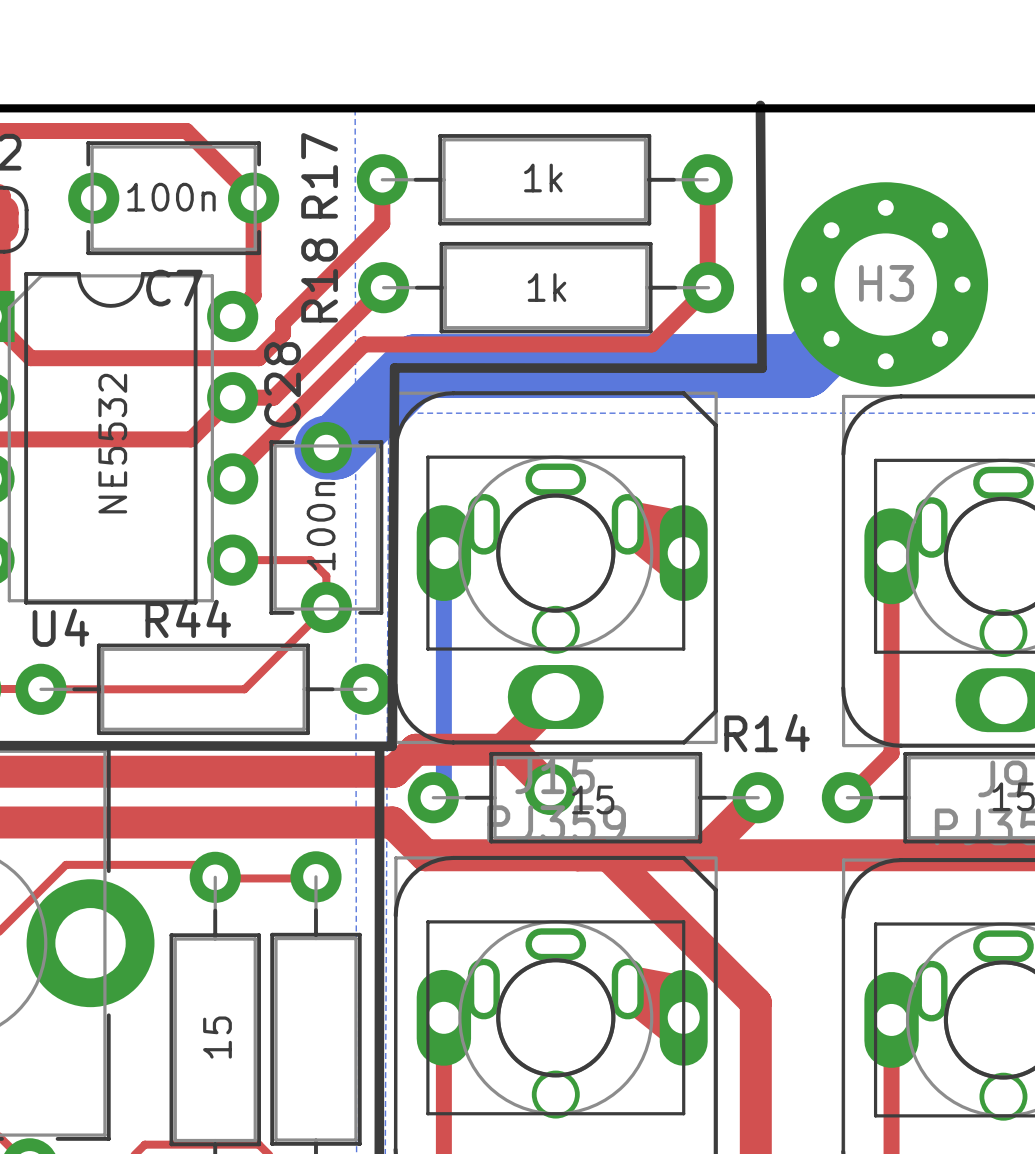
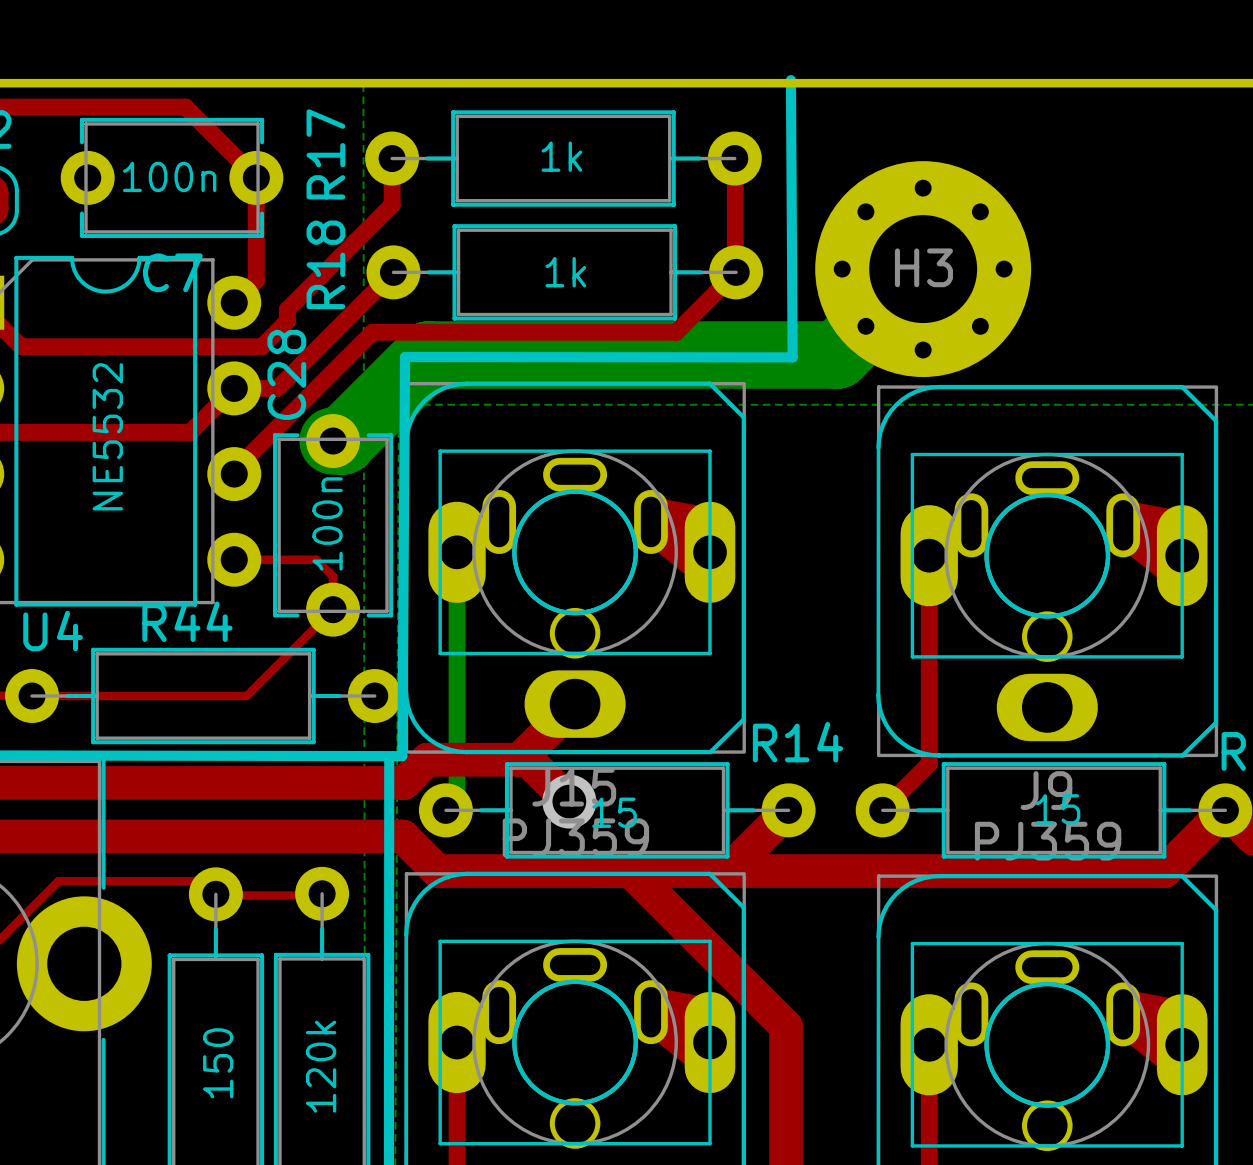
part value: 15 (217, 1037) -> 150 (218, 1063)
part value: none -> 120k (321, 1066)

